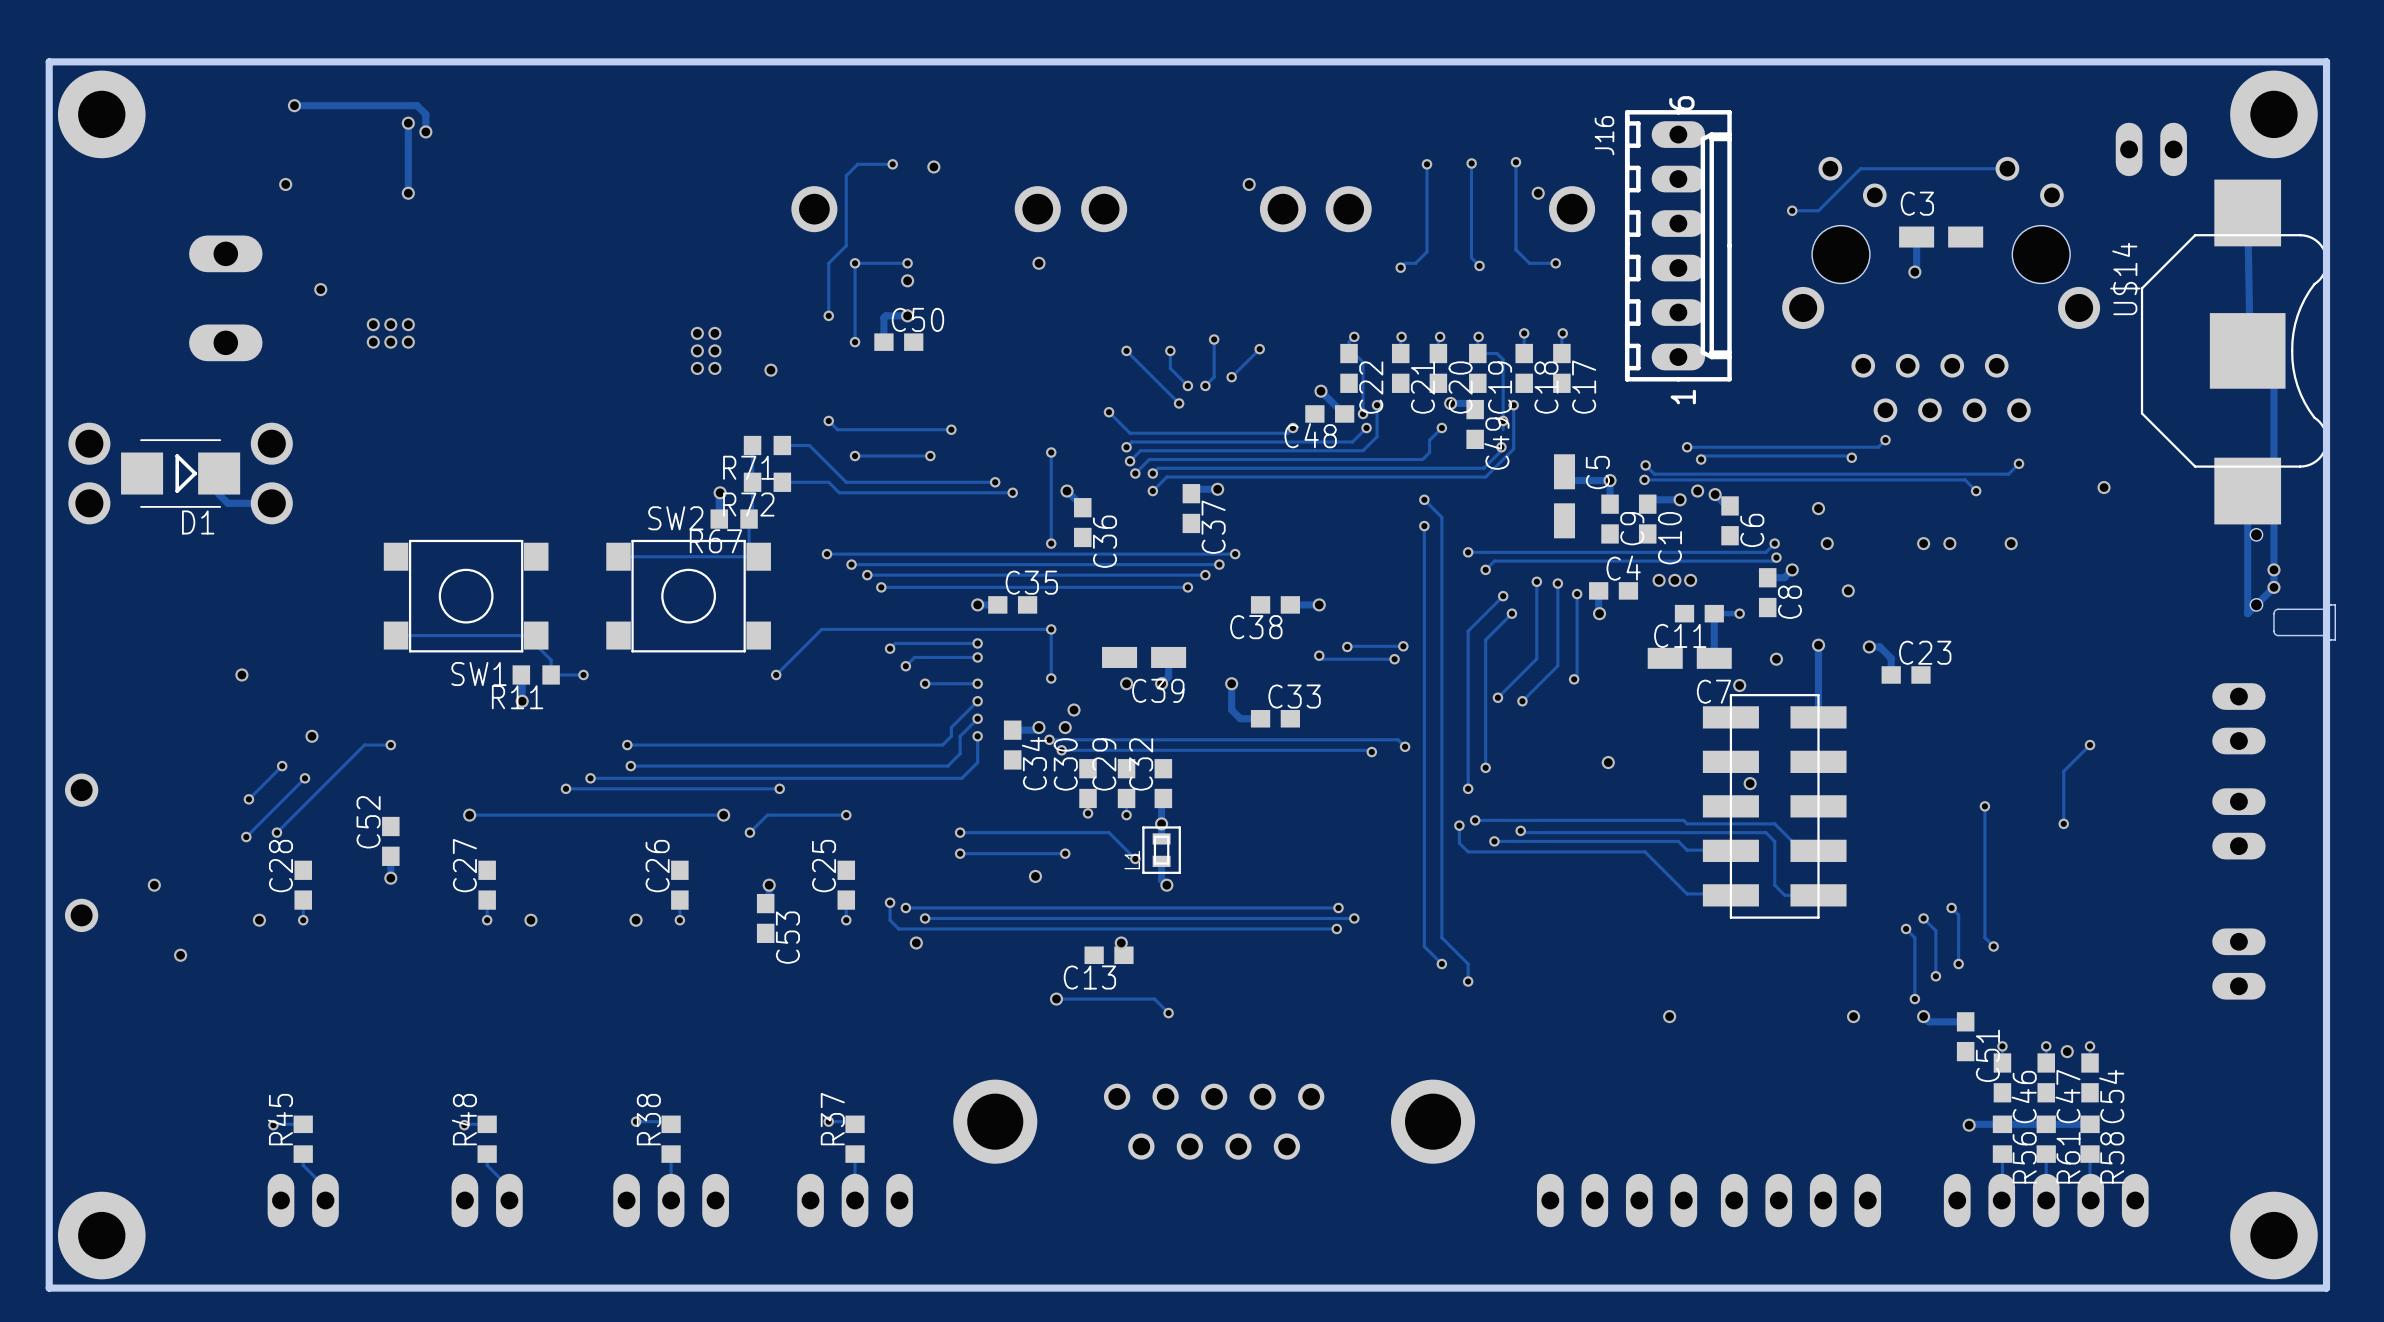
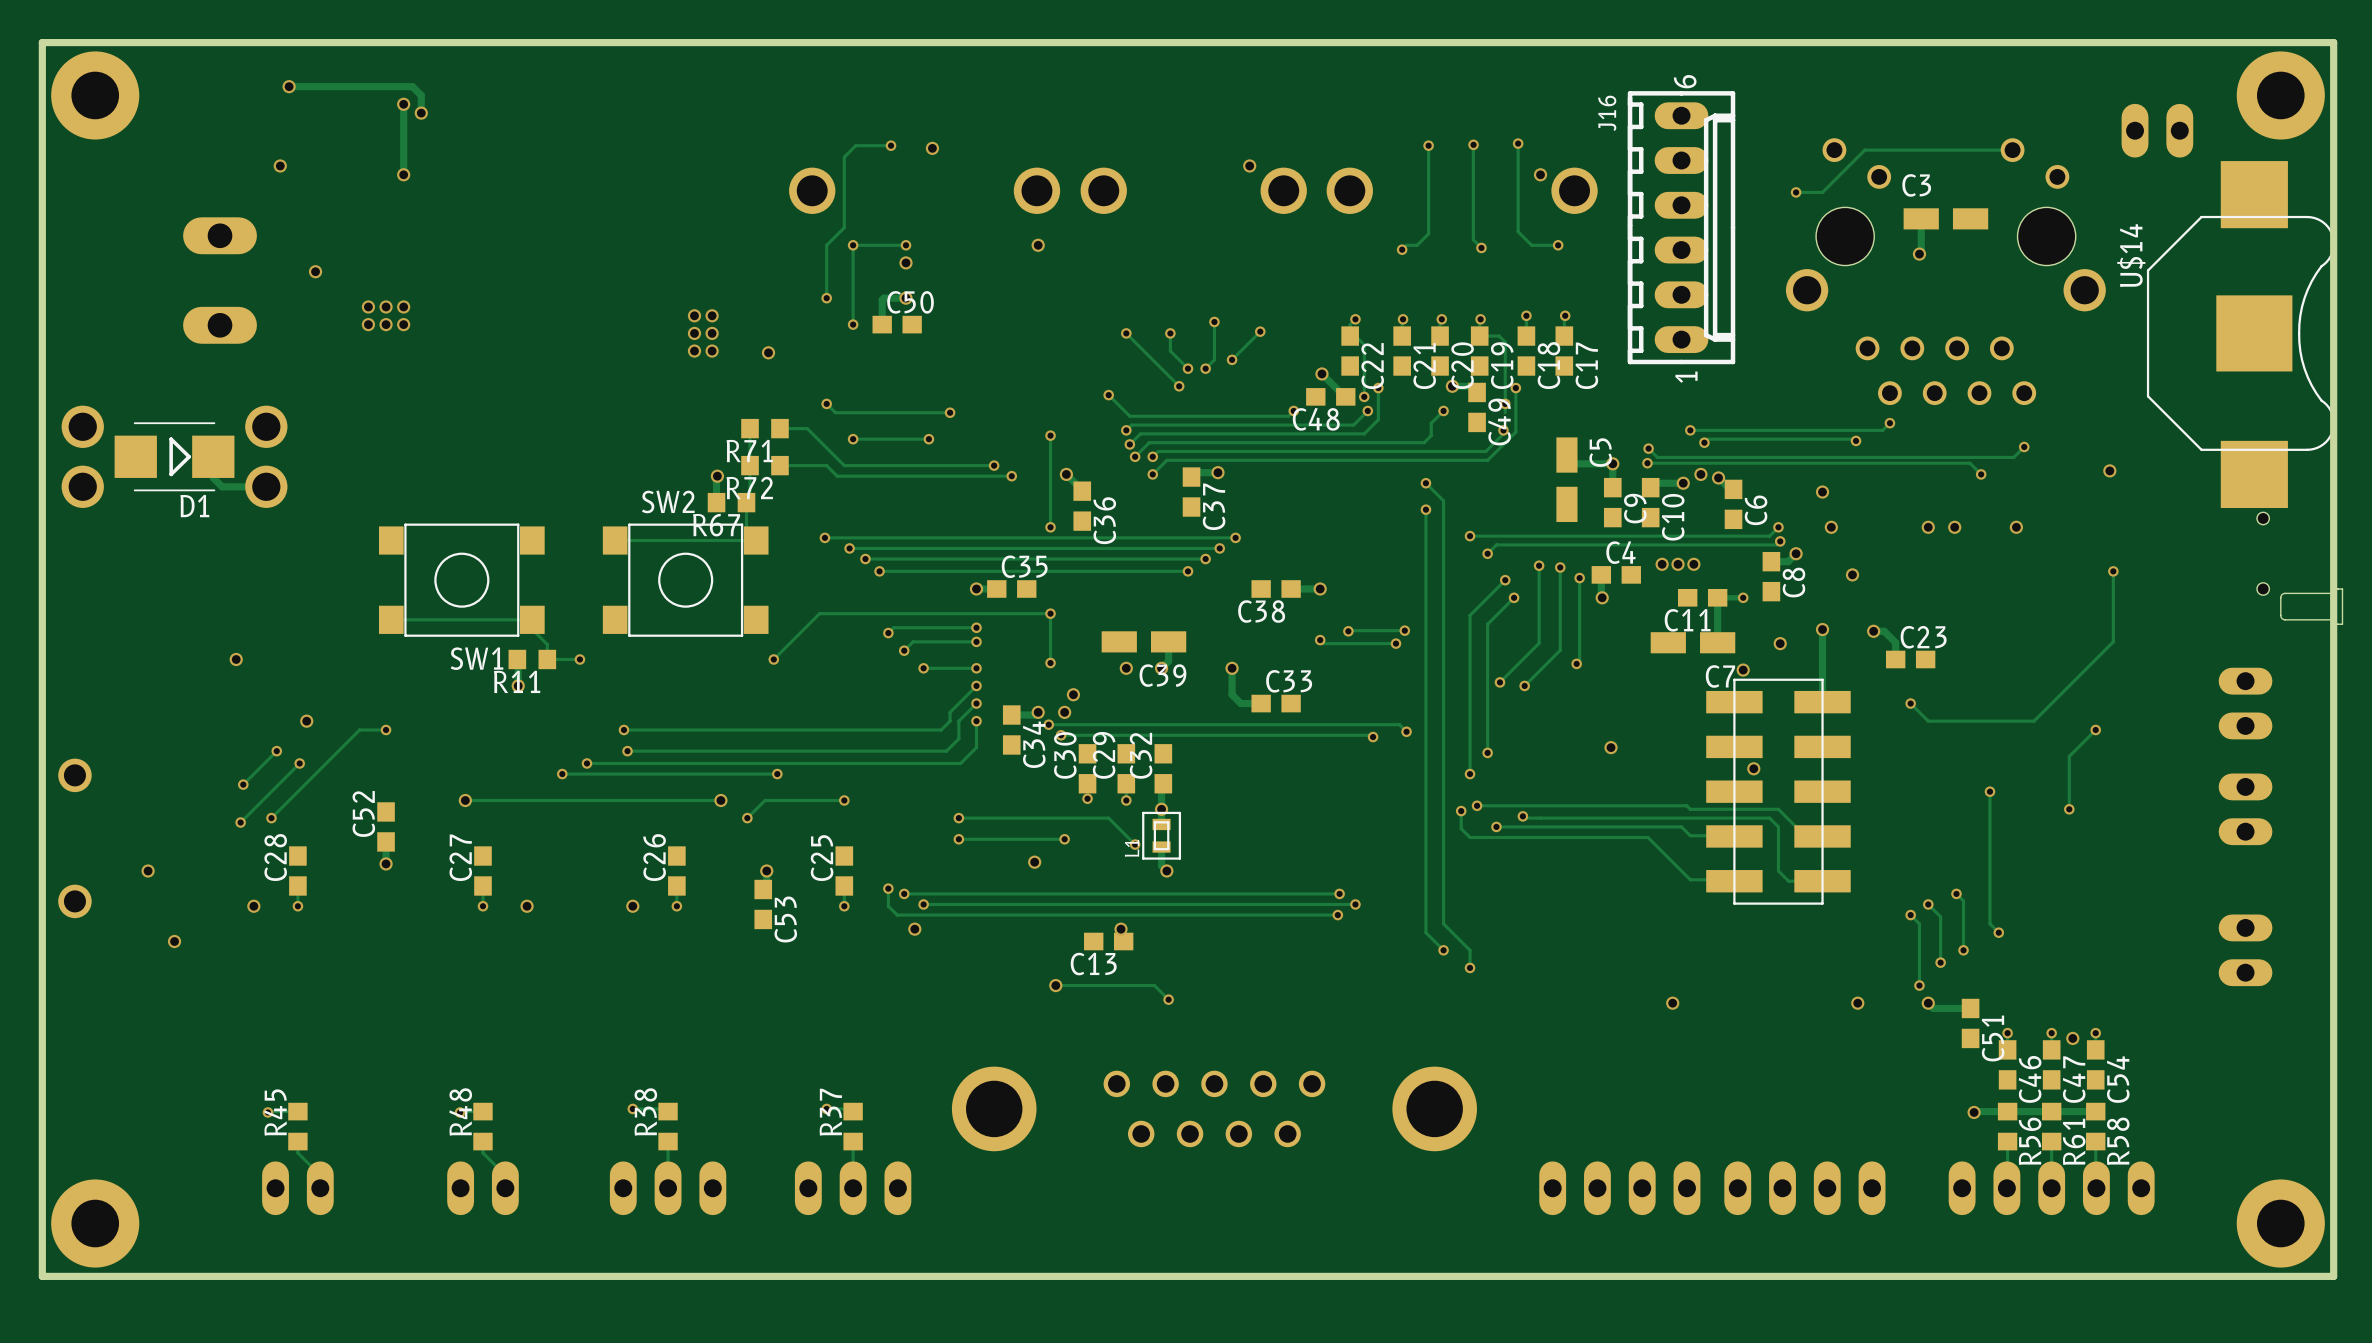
track: (2247, 212) (2249, 335) (2273, 359) (2273, 587) (2247, 613) (2247, 491) -> none
via: (2273, 569) -> none
track: none -> (2113, 571) (2113, 641) (2034, 721) (1928, 721) (1910, 703)
via: none -> (2113, 571)
via: (2273, 587) -> none
via: none -> (1910, 703)

